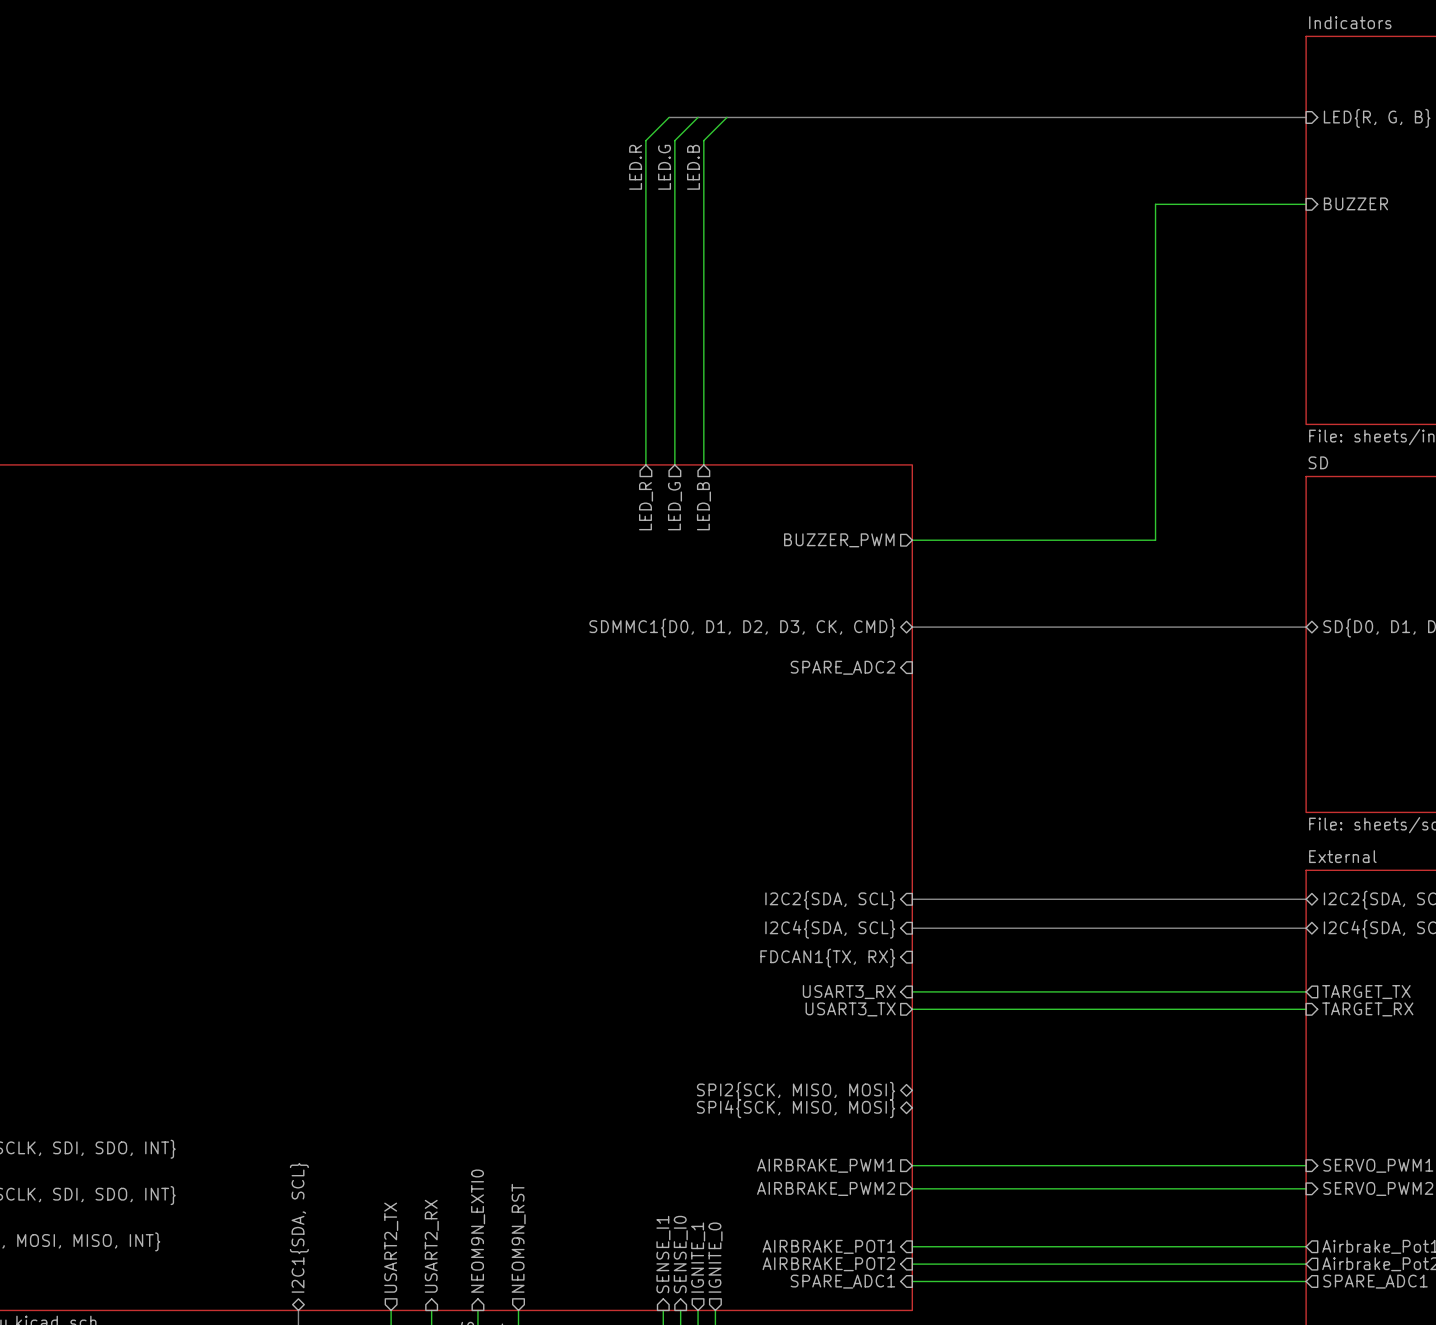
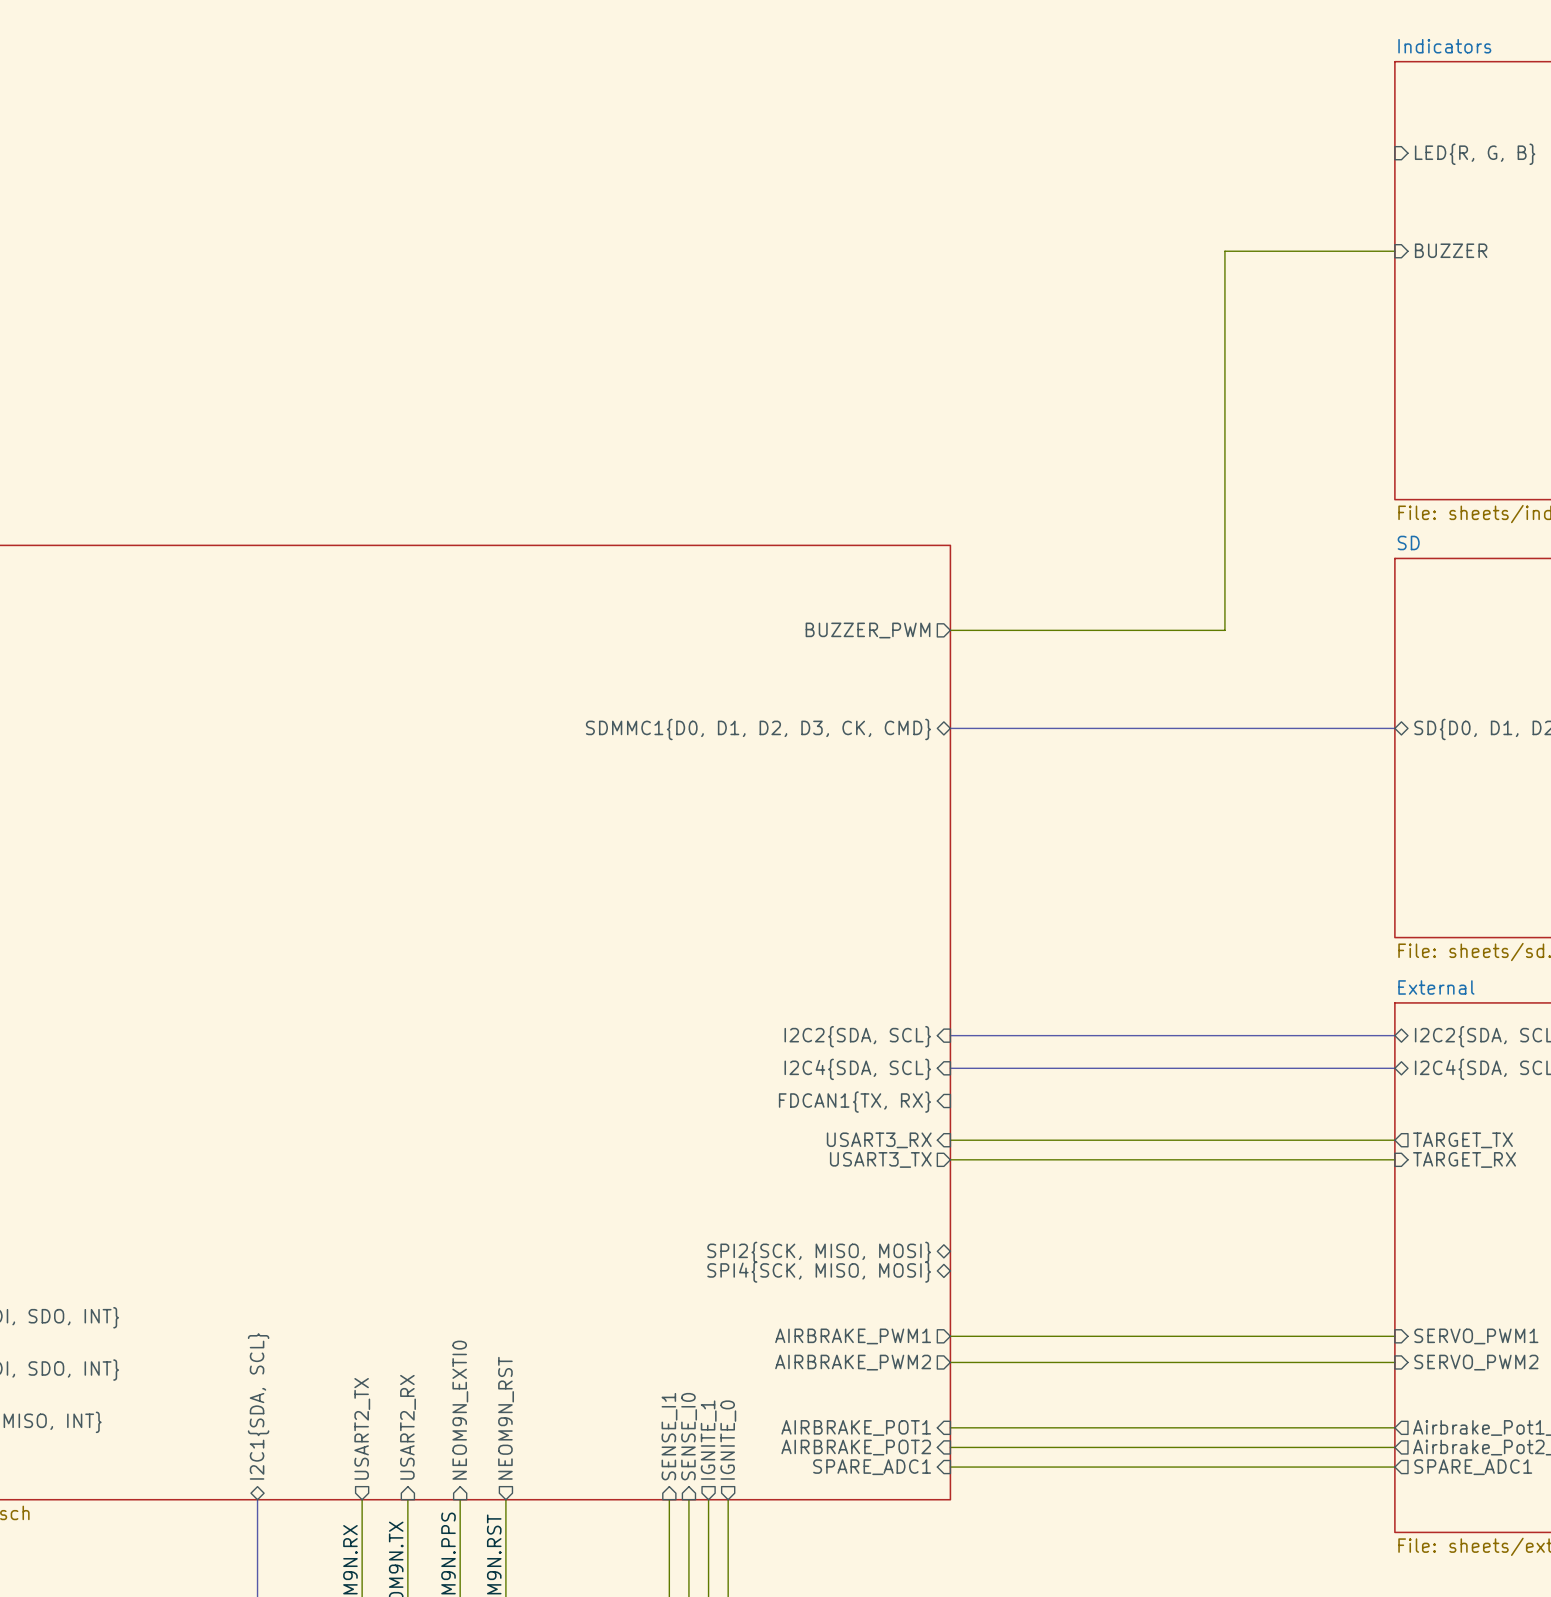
wire: (669, 117) (645, 140) (645, 464) -> none
bus: (669, 117) (1306, 117) -> none
wire: (698, 117) (674, 140) (674, 464) -> none
wire: (726, 117) (703, 140) (703, 464) -> none
label: LED.R (635, 167) -> none
label: LED.G (664, 167) -> none
label: LED.B (693, 167) -> none
sheet pin: LED_R (646, 506) -> none
sheet pin: LED_G (674, 506) -> none
sheet pin: LED_B (703, 506) -> none
sheet pin: SPARE_ADC2 (842, 667) -> none

